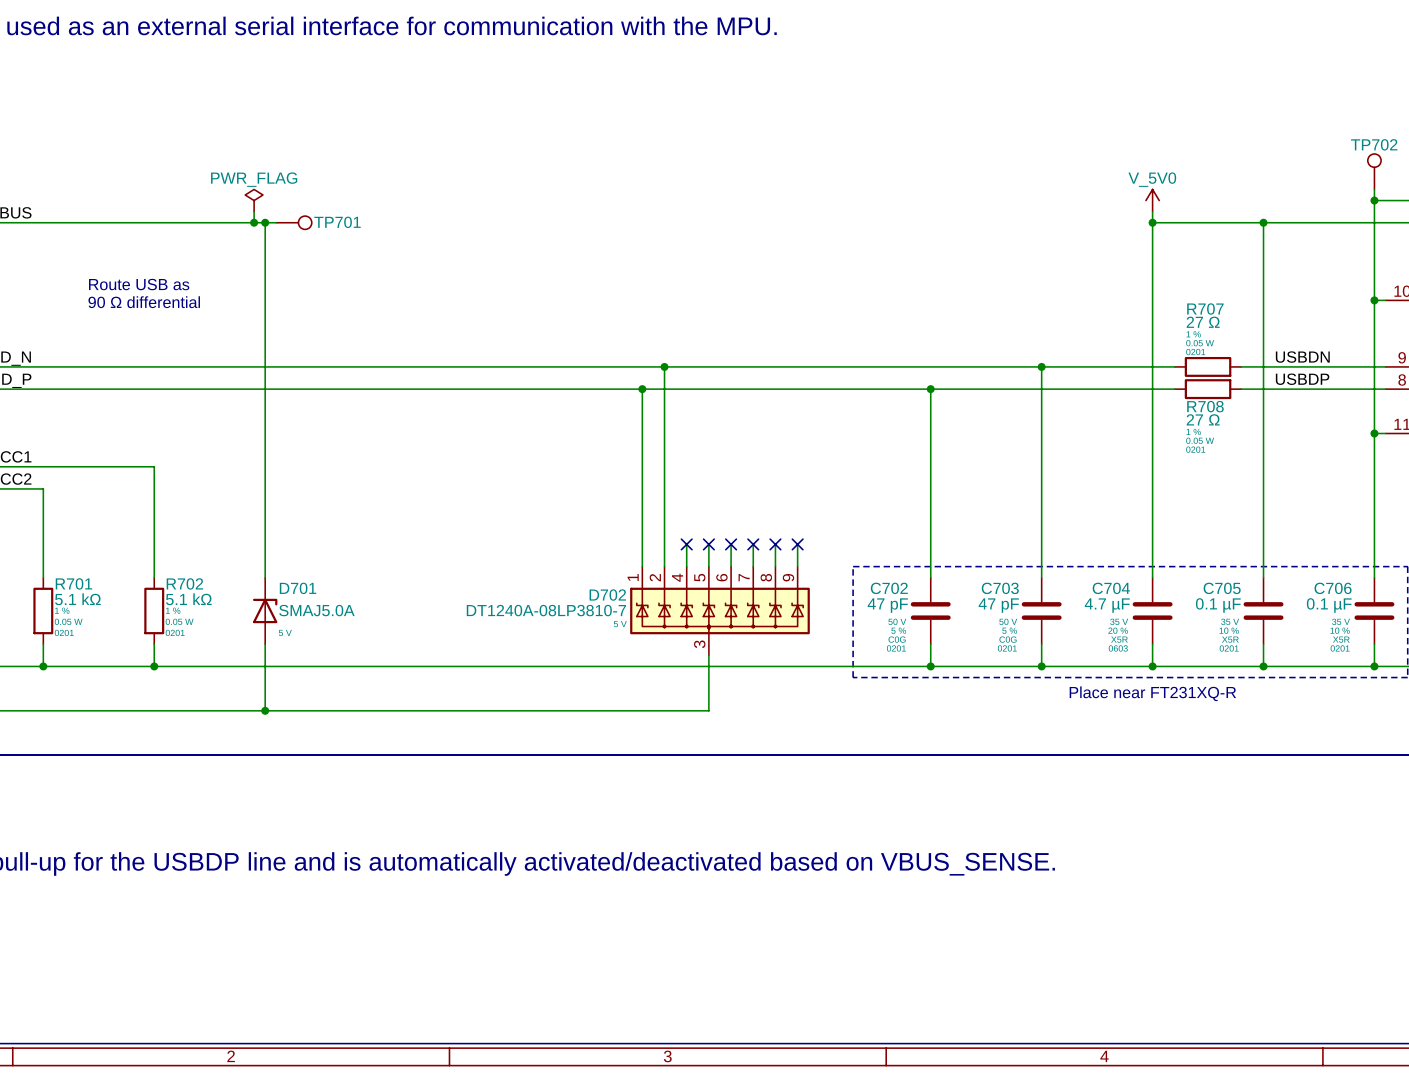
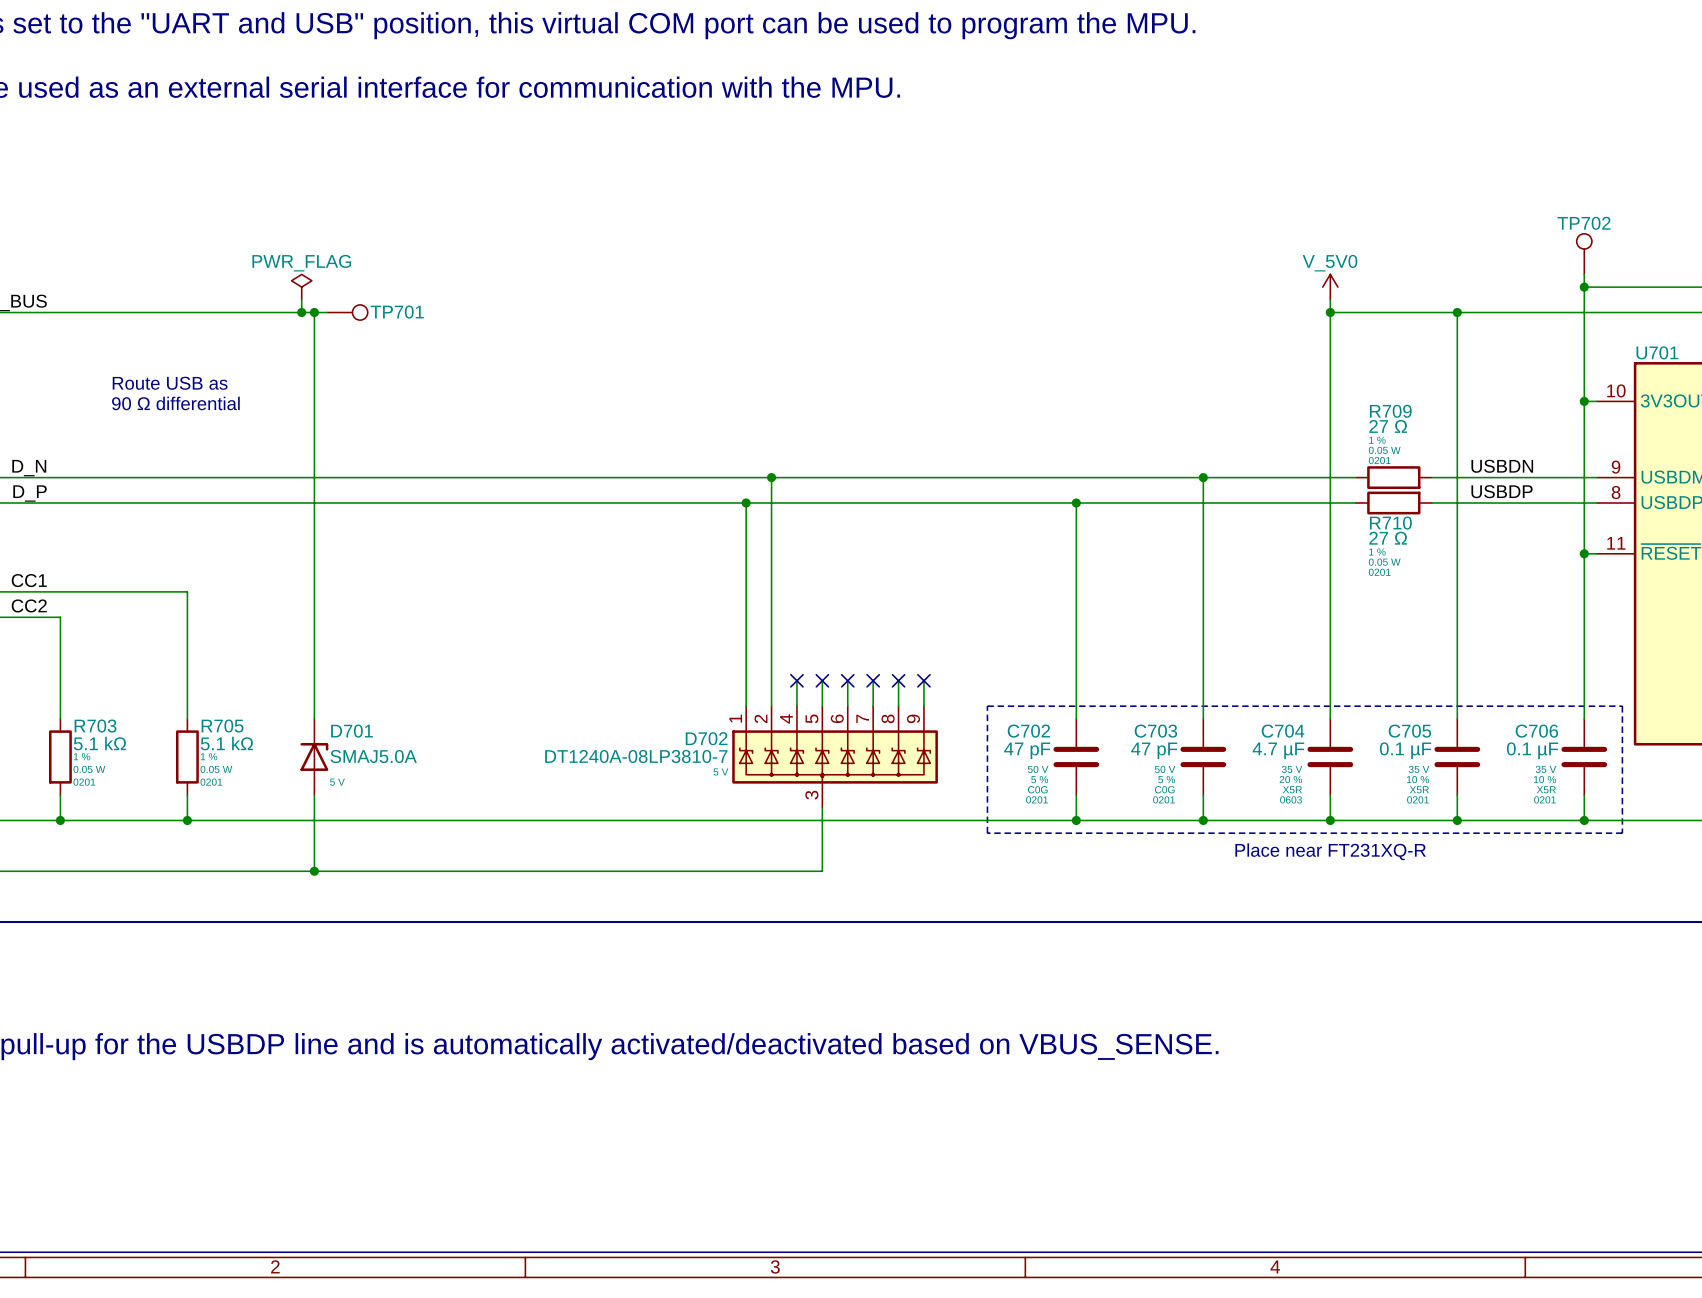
R707 name: R707 (1205, 309) -> R709 (1390, 411)
R708 name: R708 (1205, 406) -> R710 (1390, 523)
R701 name: R701 (73, 583) -> R703 (95, 726)
R702 name: R702 (184, 583) -> R705 (222, 726)

